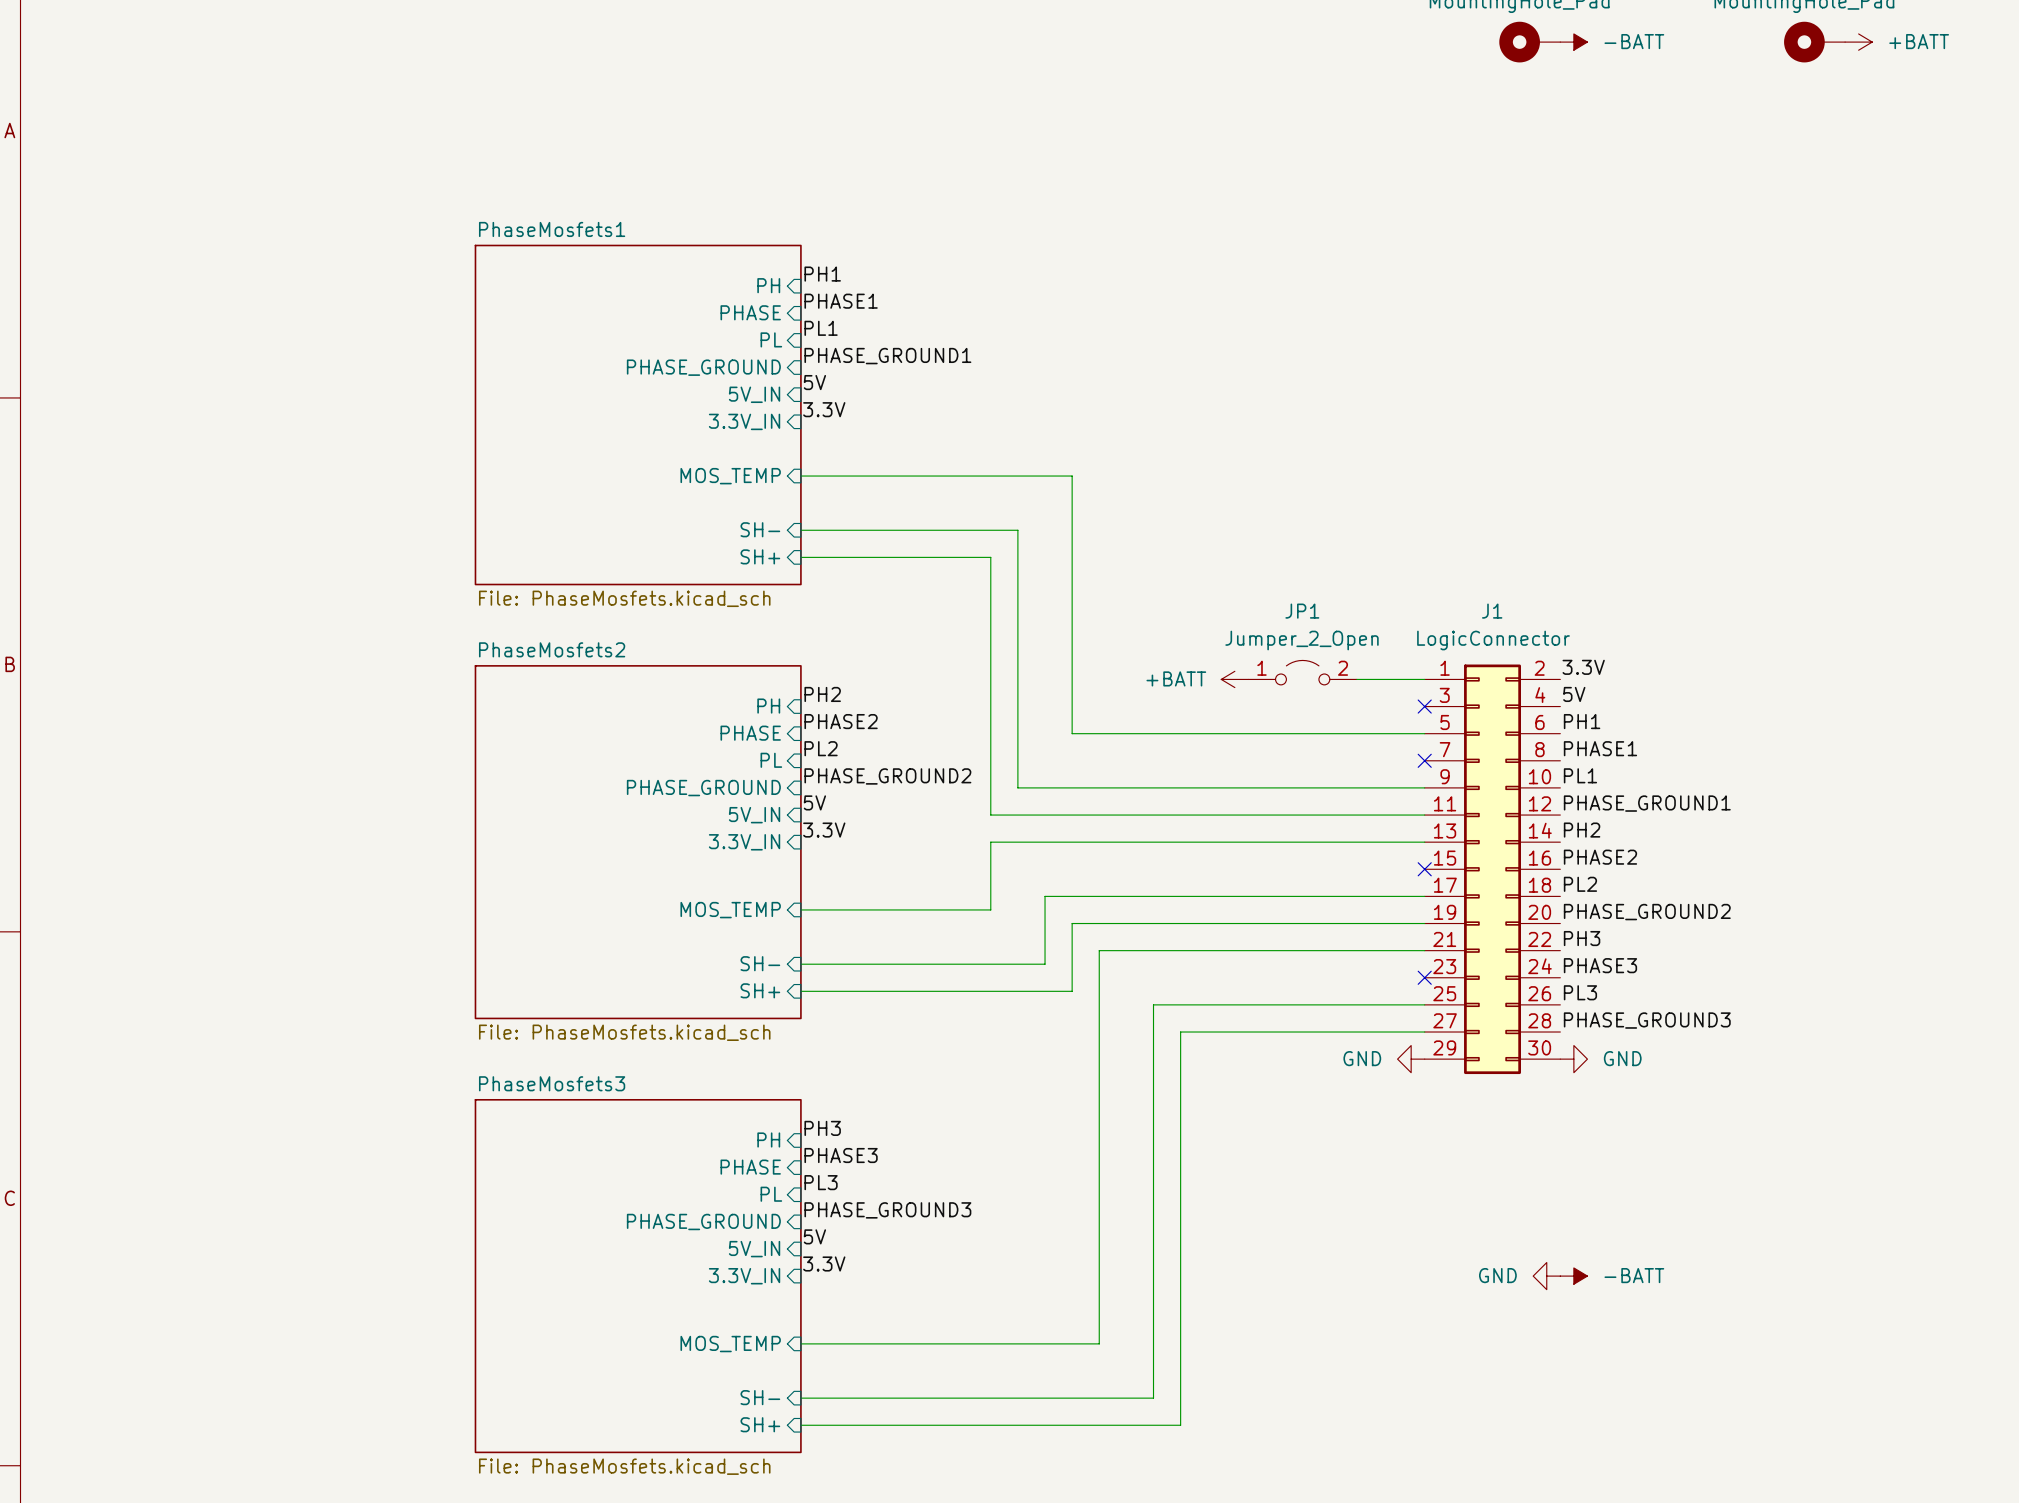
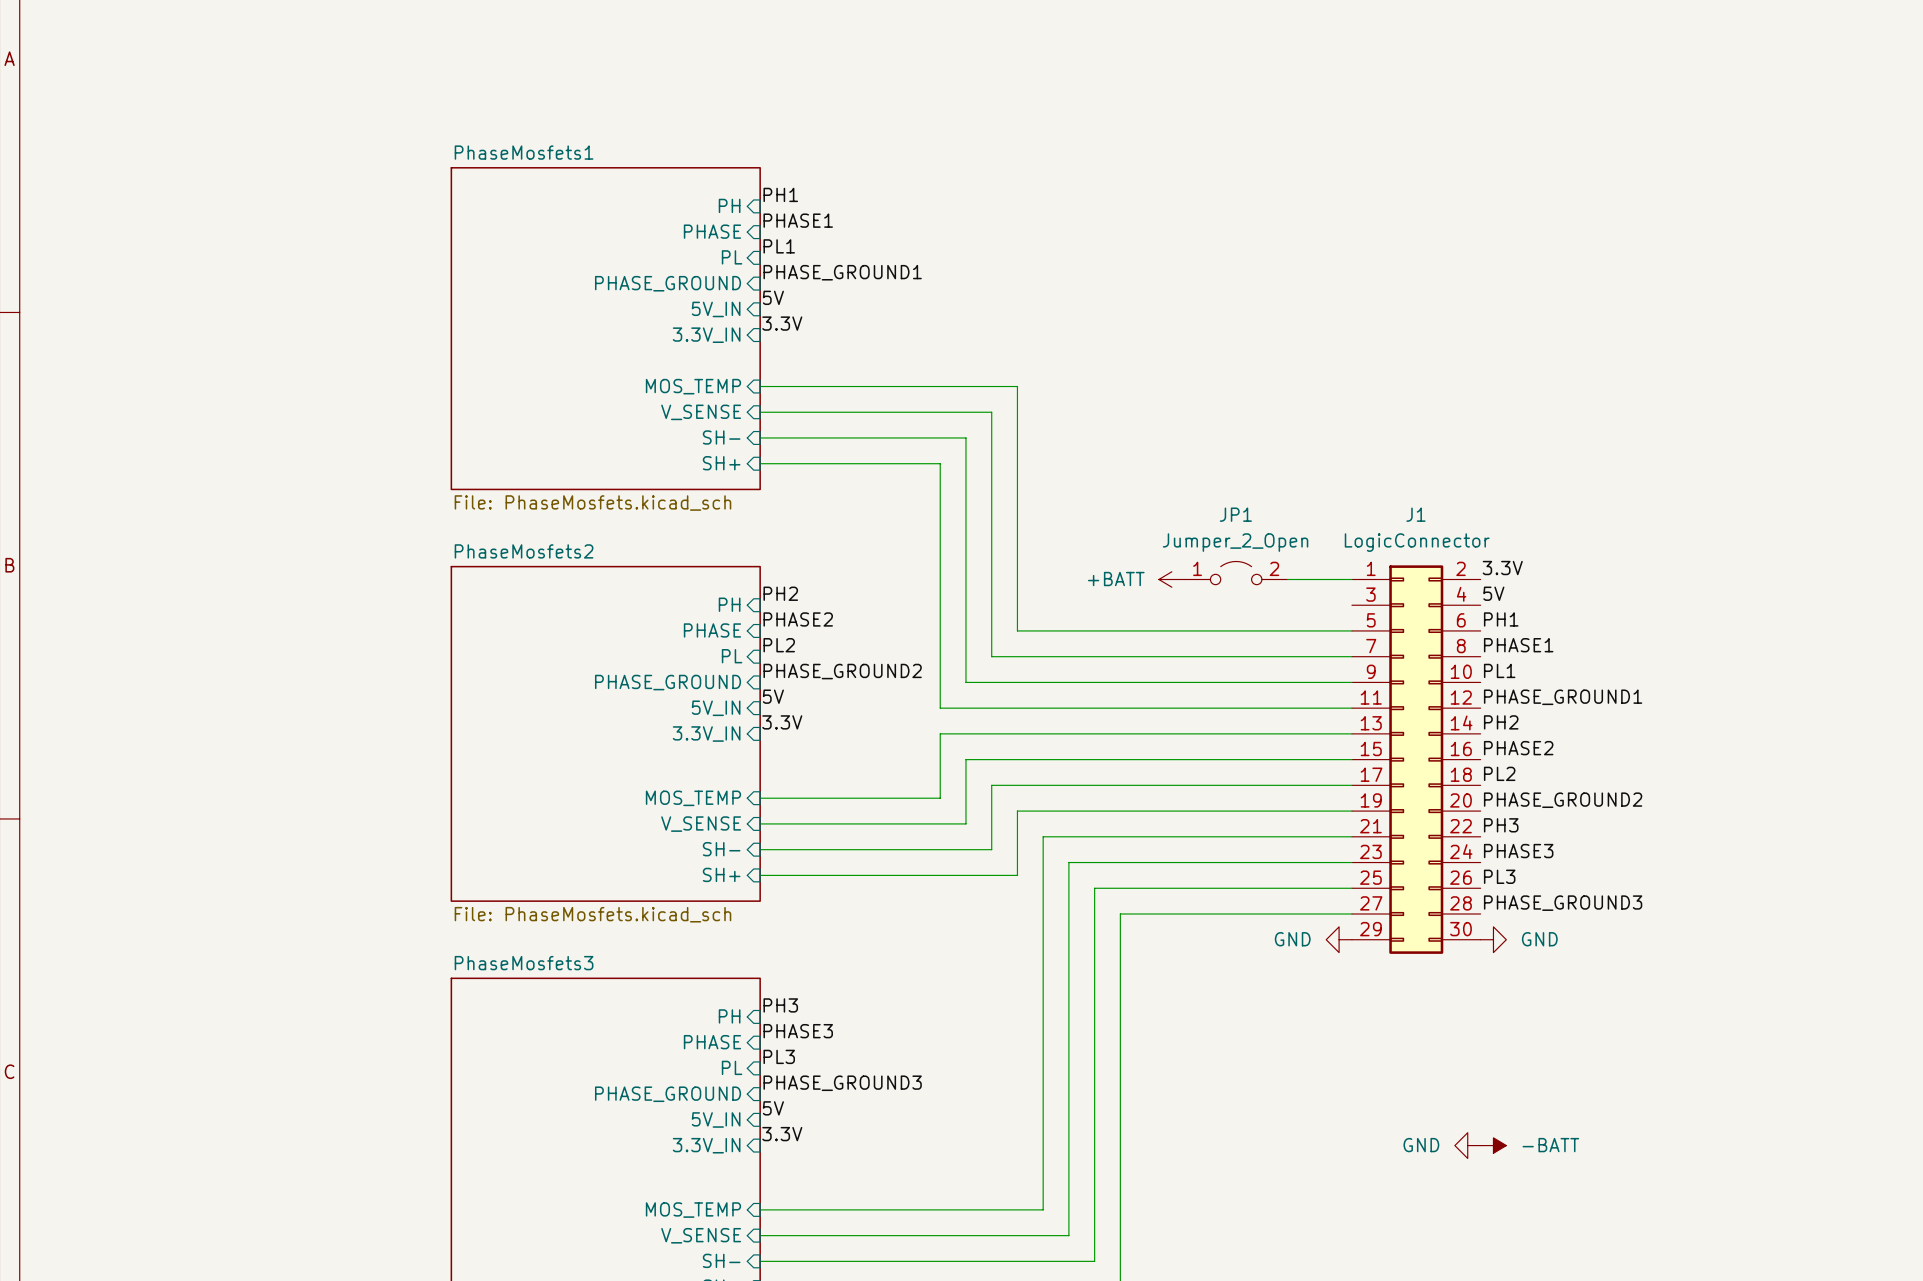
sheet pin: none -> V_SENSE (701, 412)
wire: none -> (760, 412) (991, 412) (991, 656) (1351, 656)
no-connect mark: (1424, 706) -> none
no-connect mark: (1424, 760) -> none
wire: none -> (1351, 759) (965, 759) (965, 823) (760, 823)
no-connect mark: (1424, 869) -> none
sheet pin: none -> V_SENSE (701, 824)
wire: none -> (1351, 862) (1068, 862) (1068, 1235) (760, 1235)
no-connect mark: (1424, 977) -> none
sheet pin: none -> V_SENSE (701, 1235)

